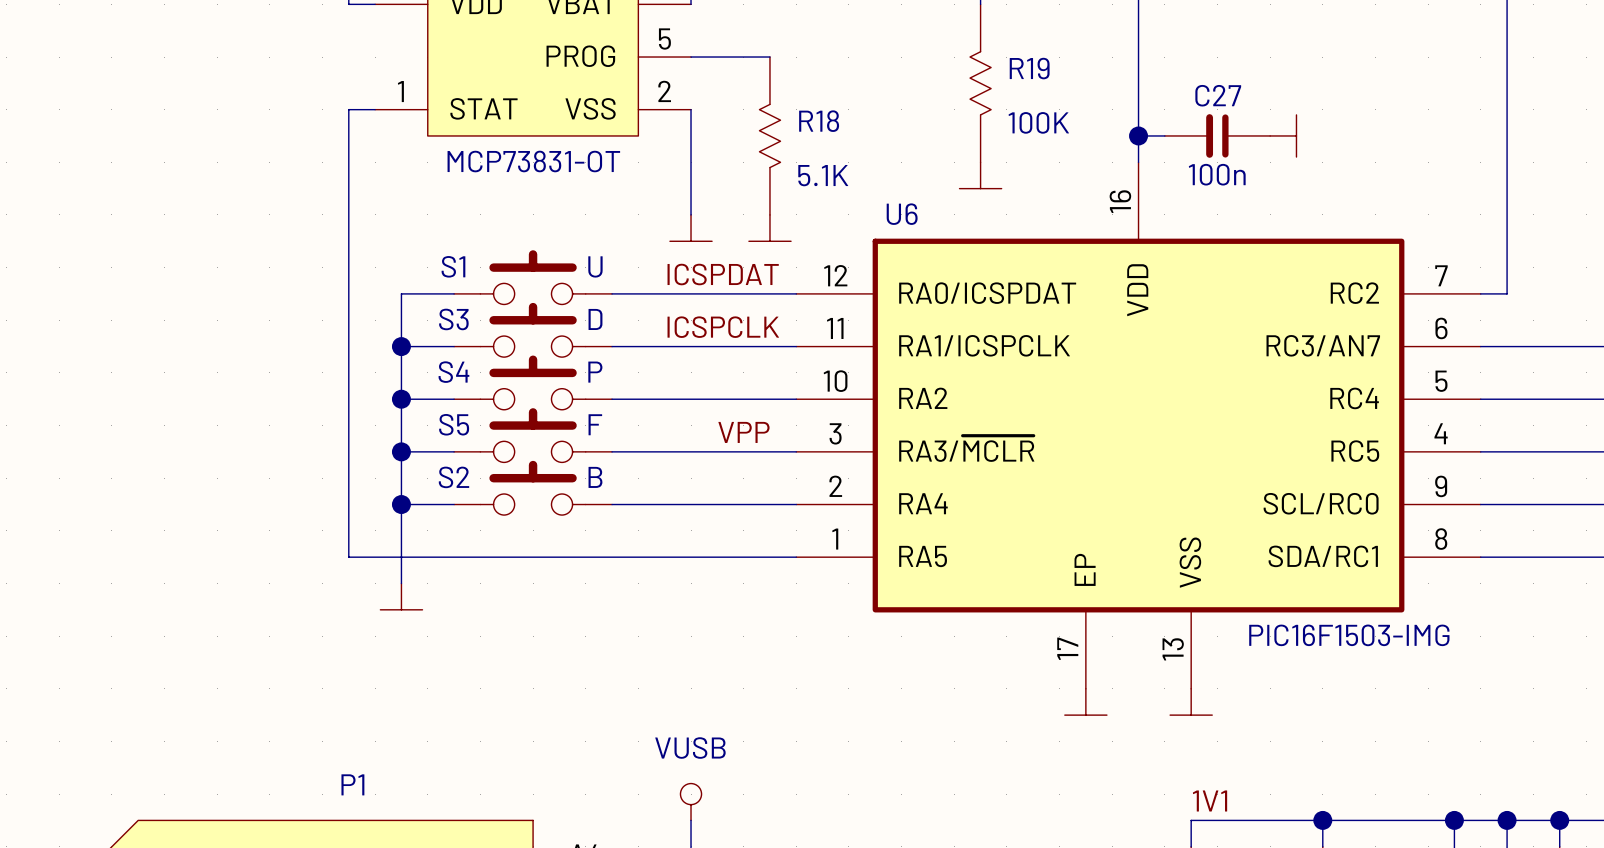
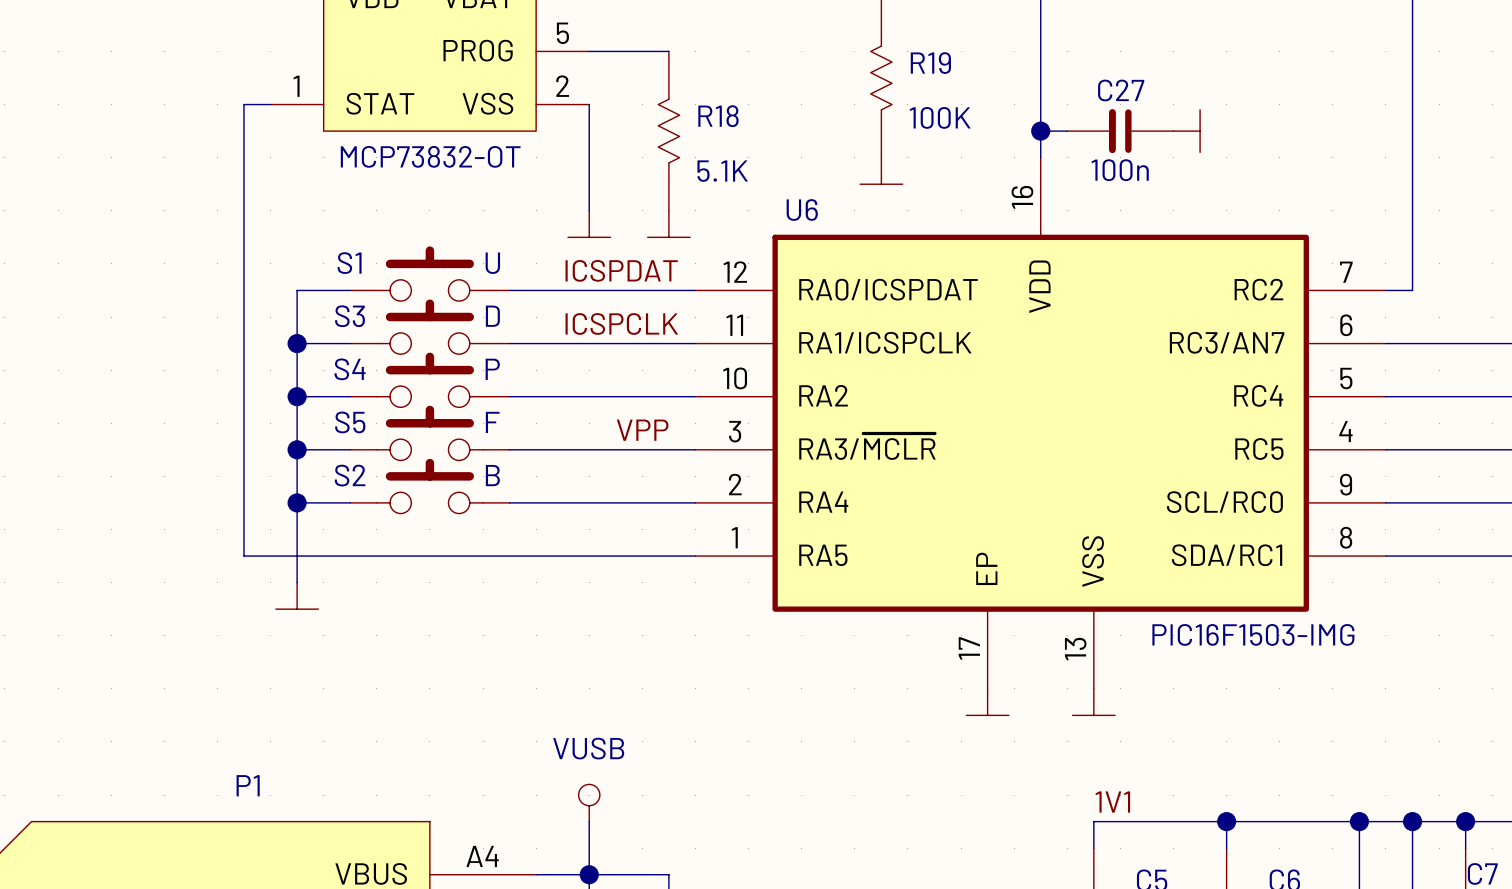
part value: MCP73831-OT (533, 161) -> MCP73832-OT (430, 156)

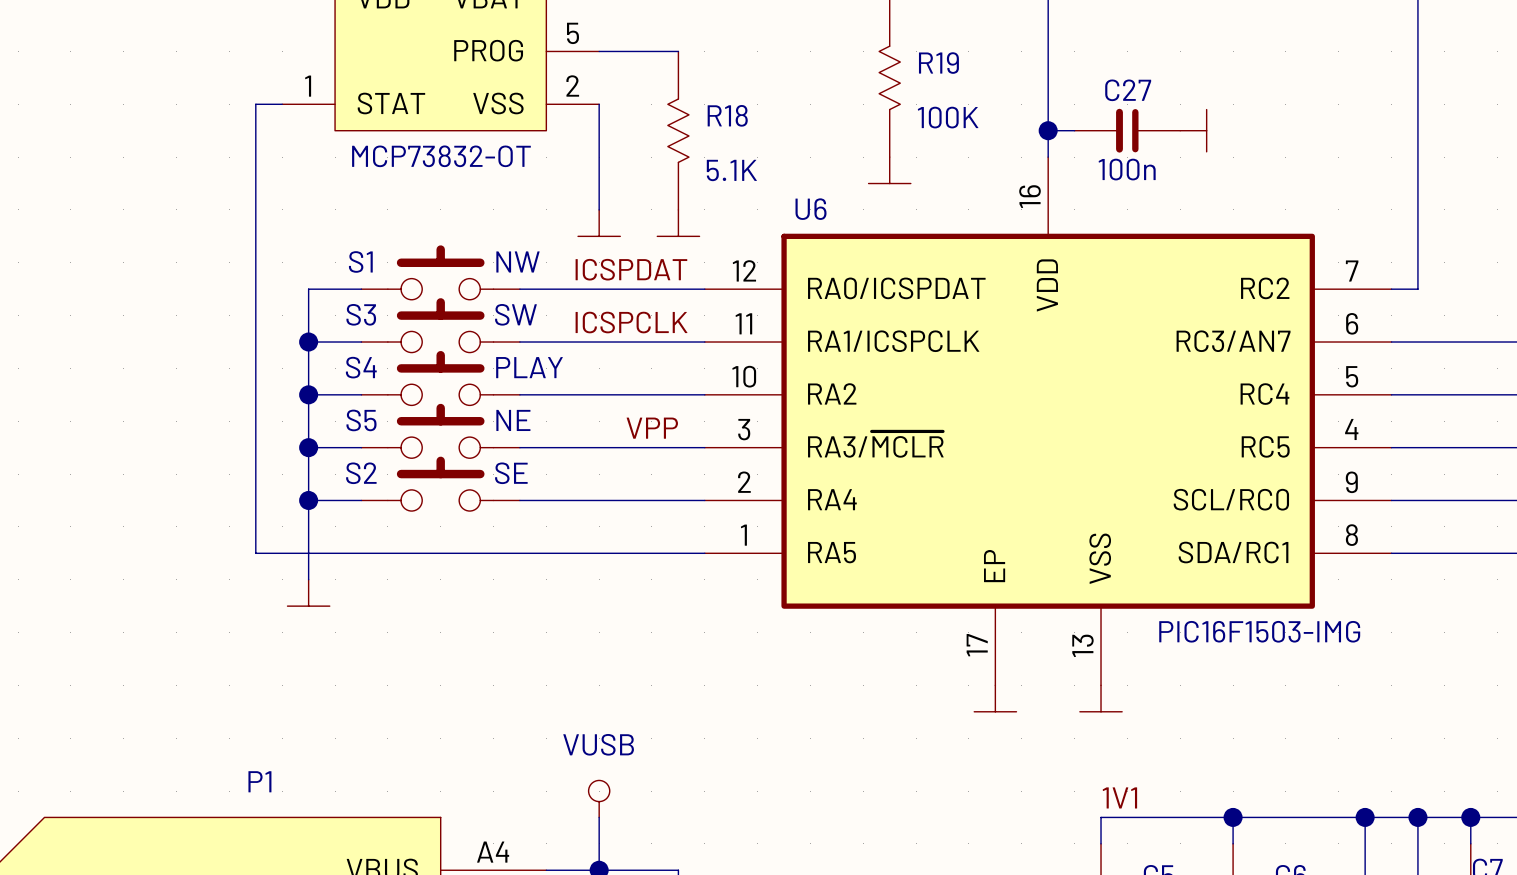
S1 value: U (492, 263) -> NW (517, 261)
S3 value: D (492, 316) -> SW (515, 314)
S4 value: P (492, 369) -> PLAY (529, 367)
S5 value: F (492, 422) -> NE (513, 420)
S2 value: B (492, 475) -> SE (511, 473)

